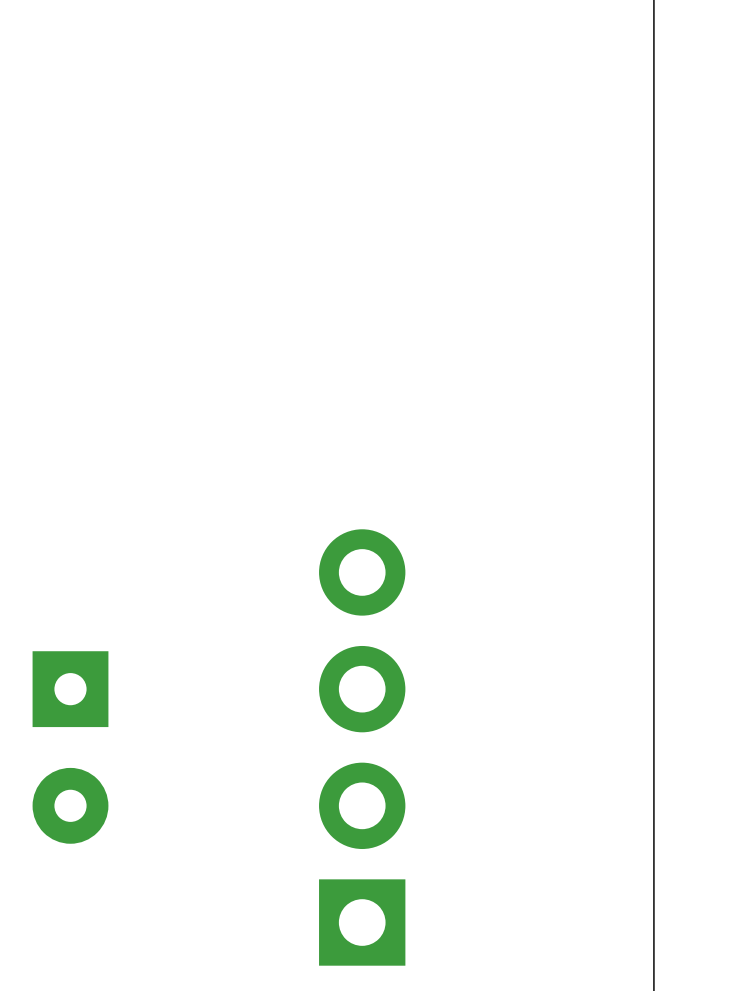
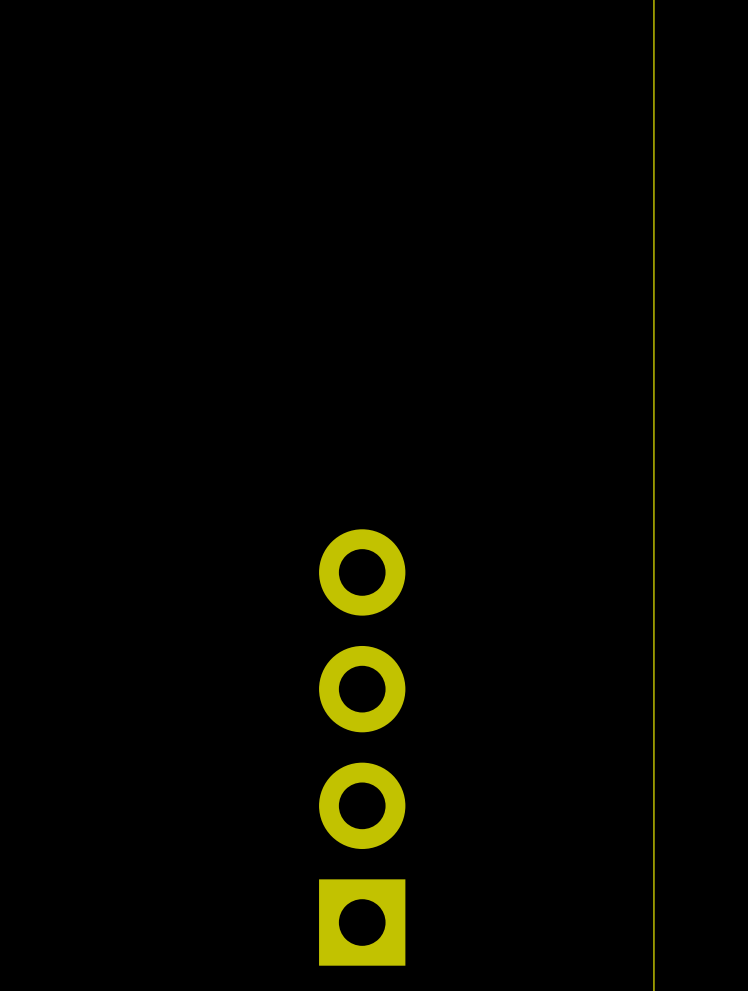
part: (70, 747) -> none

